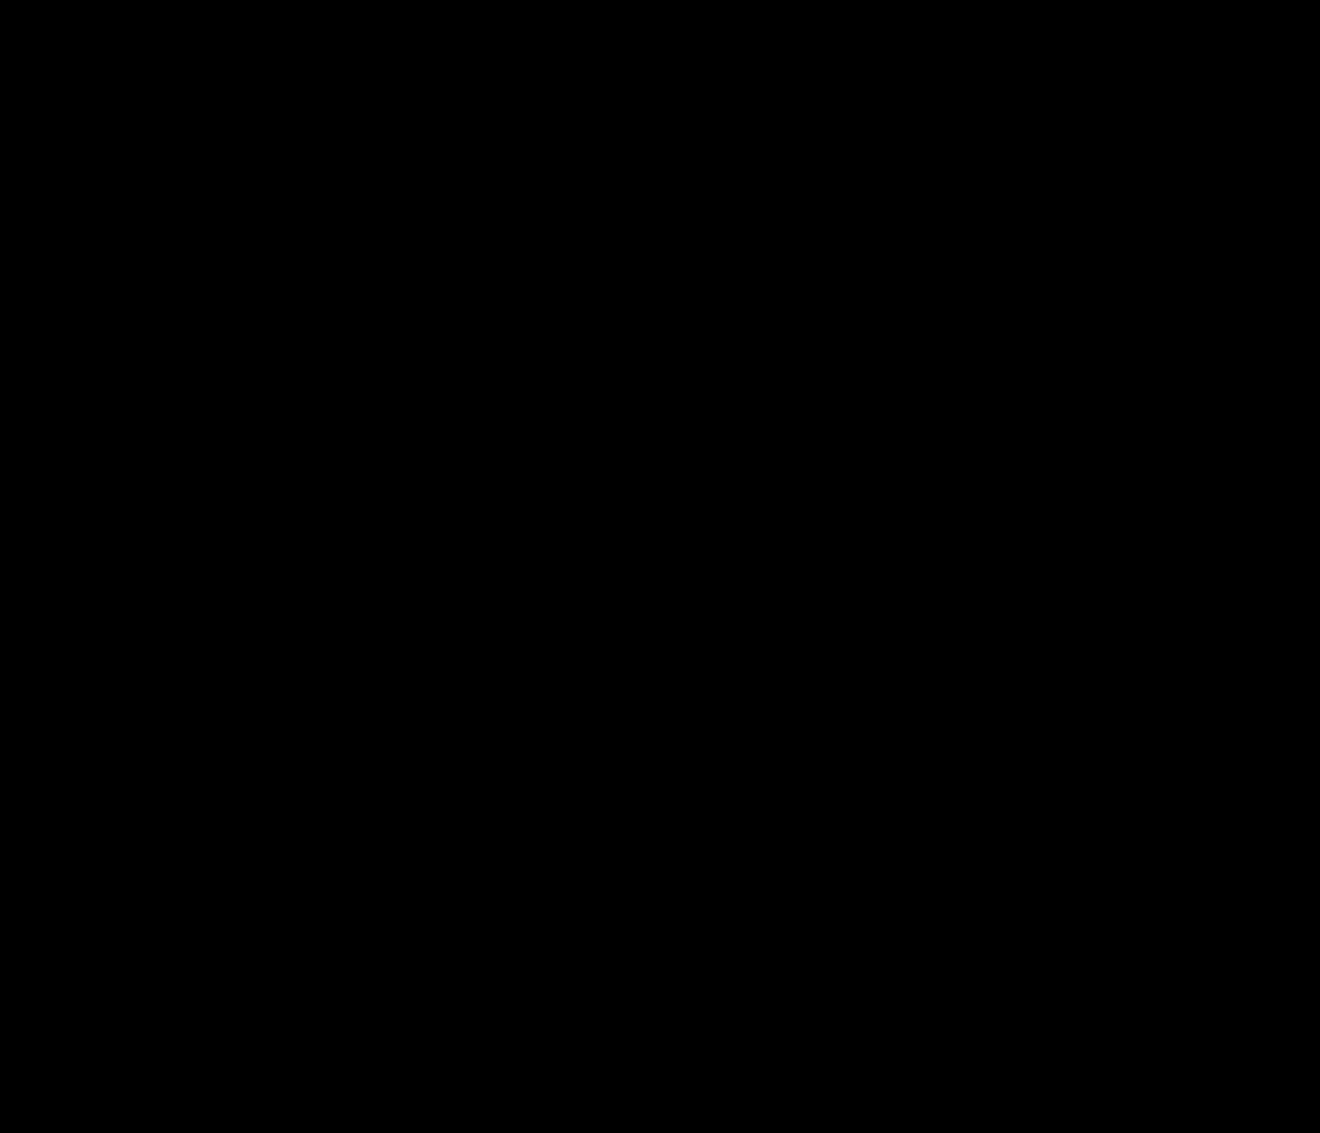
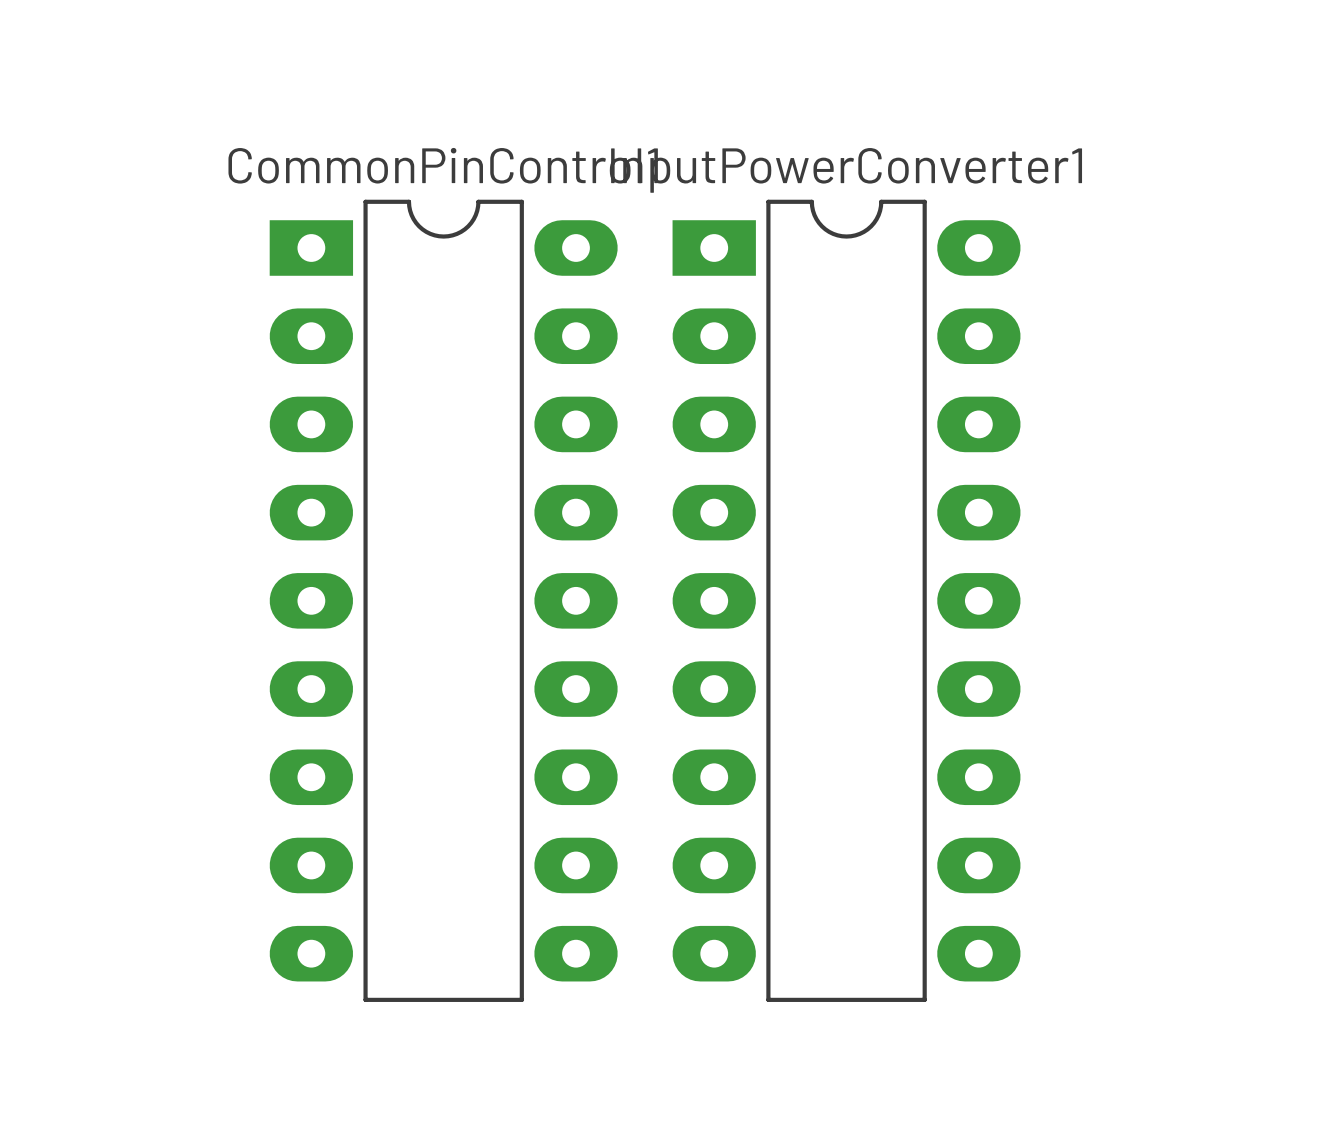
CommonPinControl1: none -> (443, 600)
InputPowerConverter1: none -> (846, 600)

